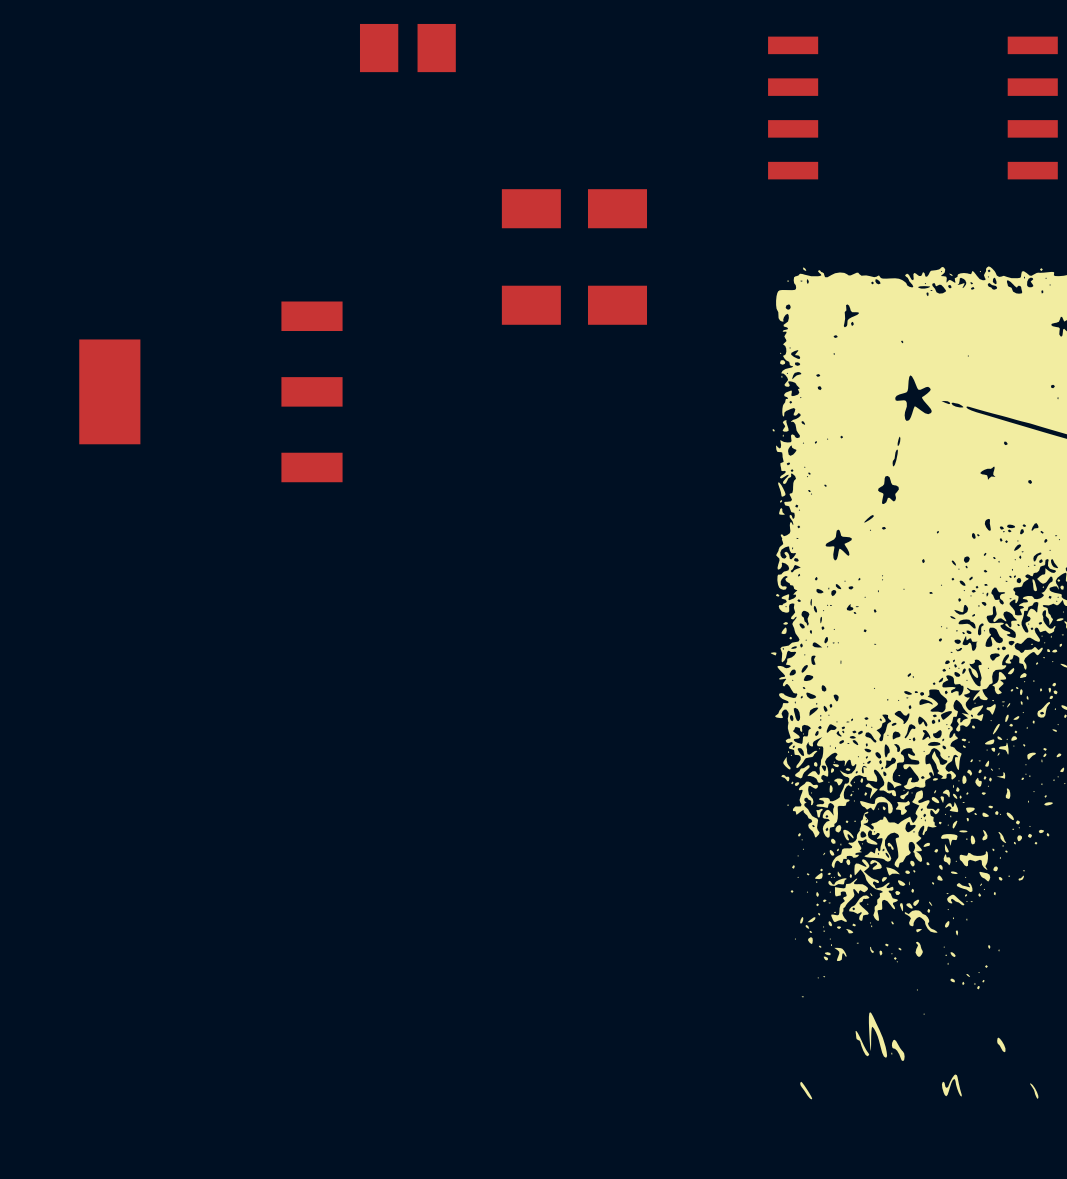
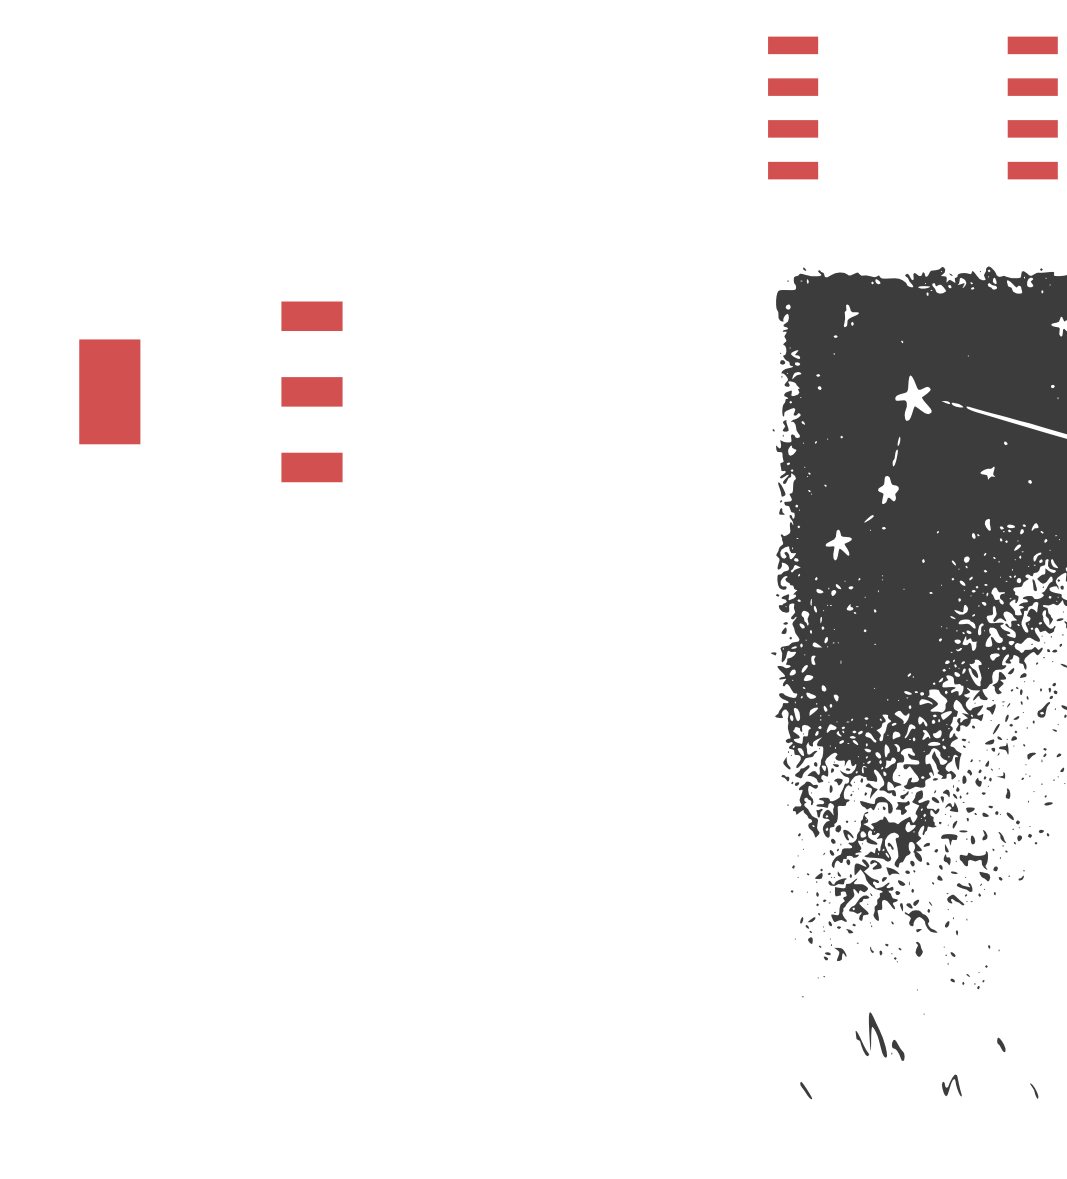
part: (407, 48) -> none
part: (574, 208) -> none
part: (574, 305) -> none

